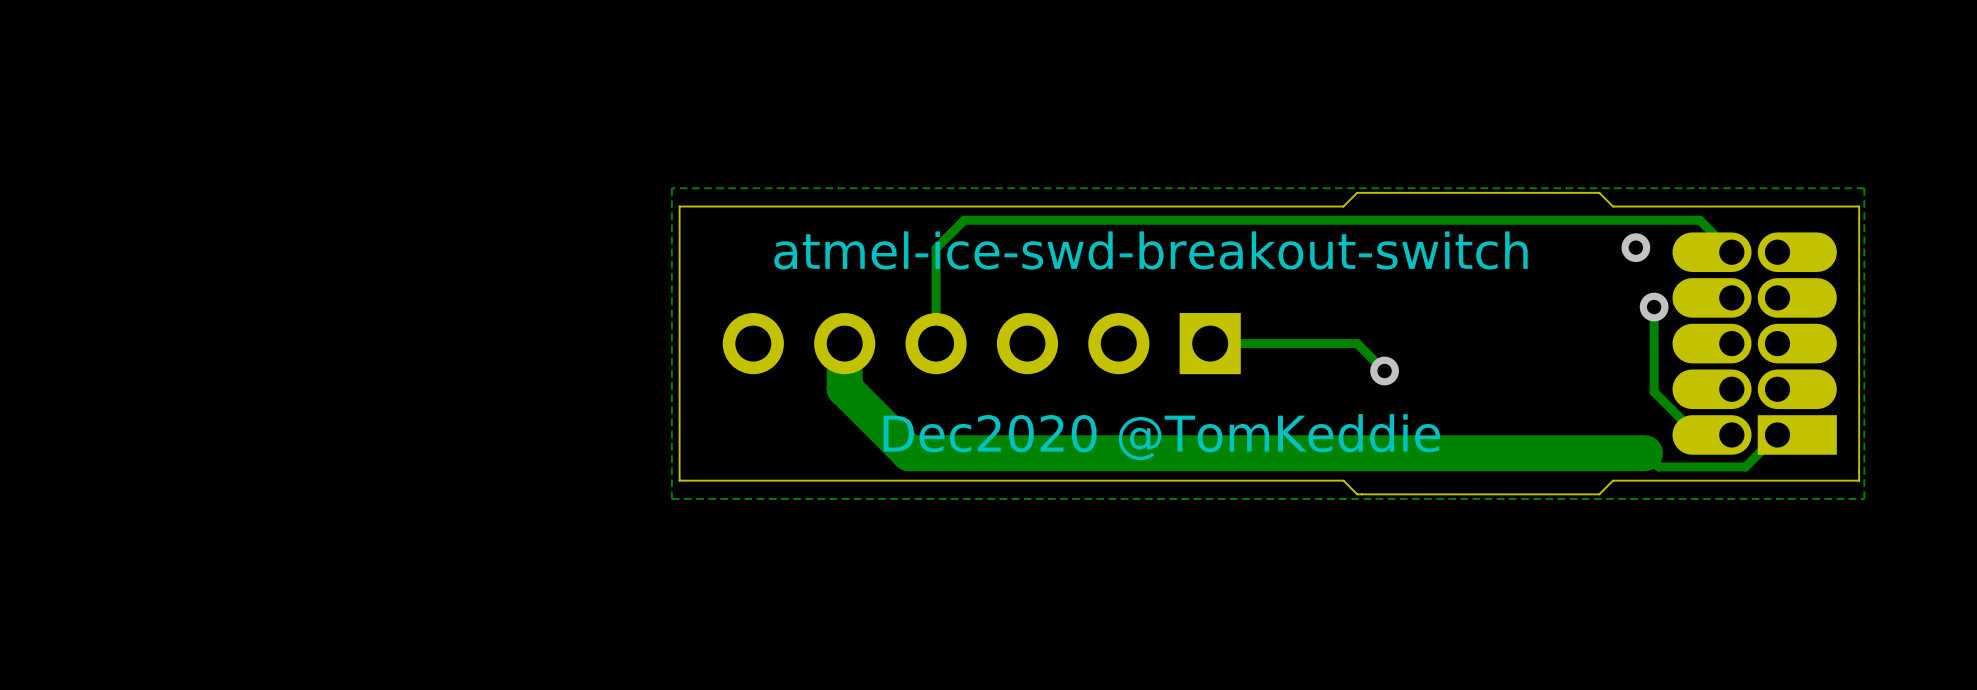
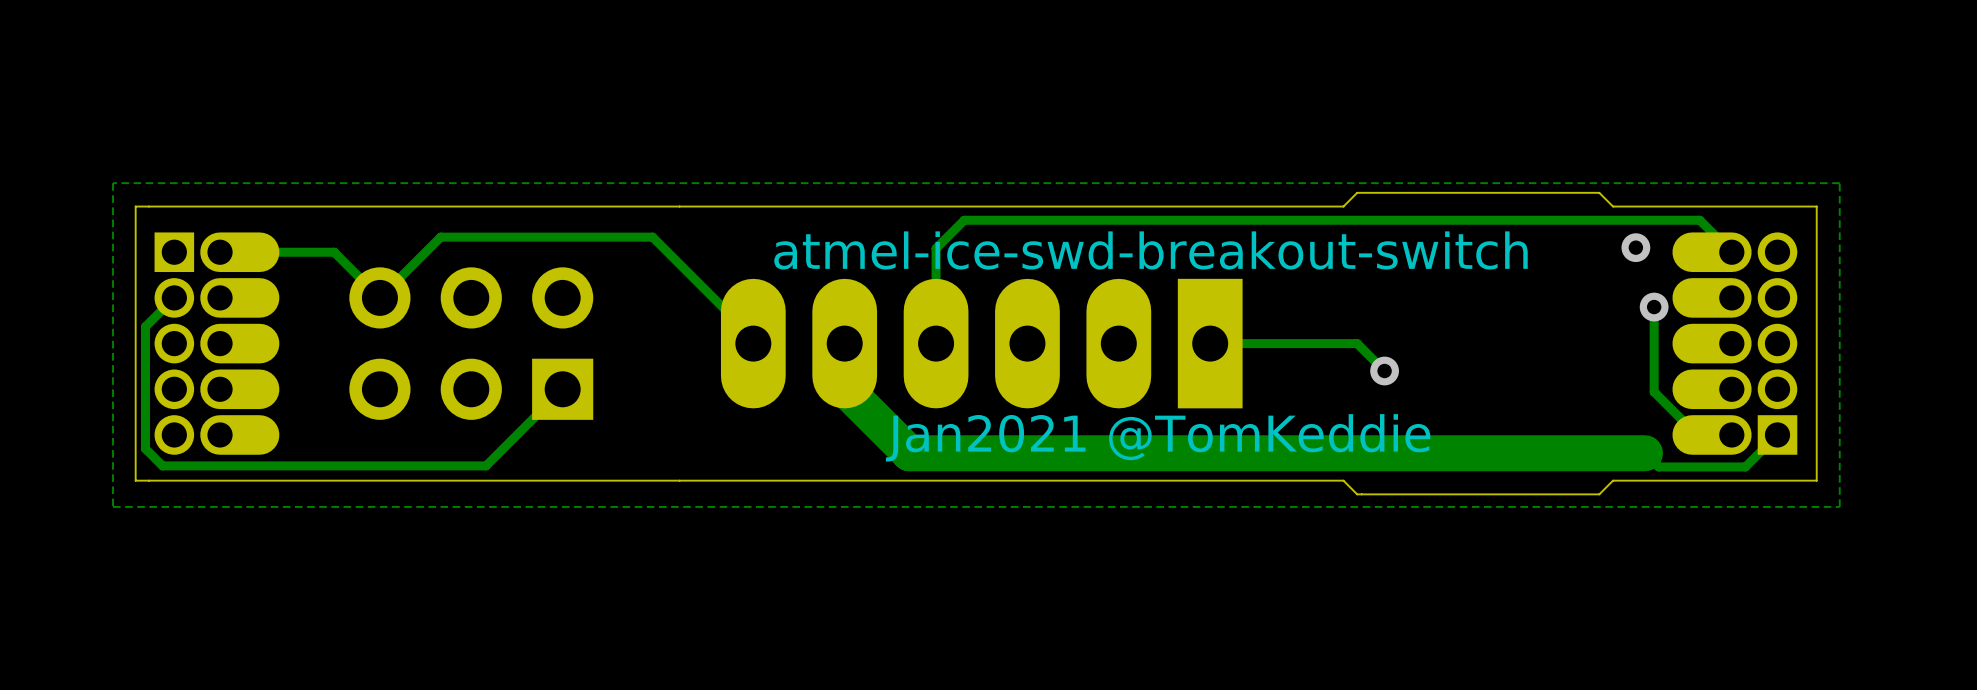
zone outline: (1864, 188) (1864, 498) (671, 498) (671, 188) (1864, 188) -> (1839, 183) (1839, 506) (113, 506) (113, 183) (1839, 183)
board edge: (679, 206) (679, 480) -> (679, 206) (135, 206) (135, 480) (679, 480)
board edge: (1816, 206) (1859, 206) (1859, 480) (1816, 480) -> (1816, 206) (1816, 480)
part footprint: [1672, 232, 1837, 455] -> [1672, 232, 1798, 455]
track: none -> (220, 252) (334, 252) (379, 297) (440, 237) (652, 237) (753, 337)
track: none -> (174, 297) (145, 326) (145, 448) (162, 465) (486, 465) (562, 389)
part footprint: [722, 313, 1241, 375] -> [720, 278, 1243, 409]
part: none -> (216, 343)
part: none -> (471, 343)
text: Dec2020 @TomKeddie (1161, 437) -> Jan2021 @TomKeddie (1158, 437)

